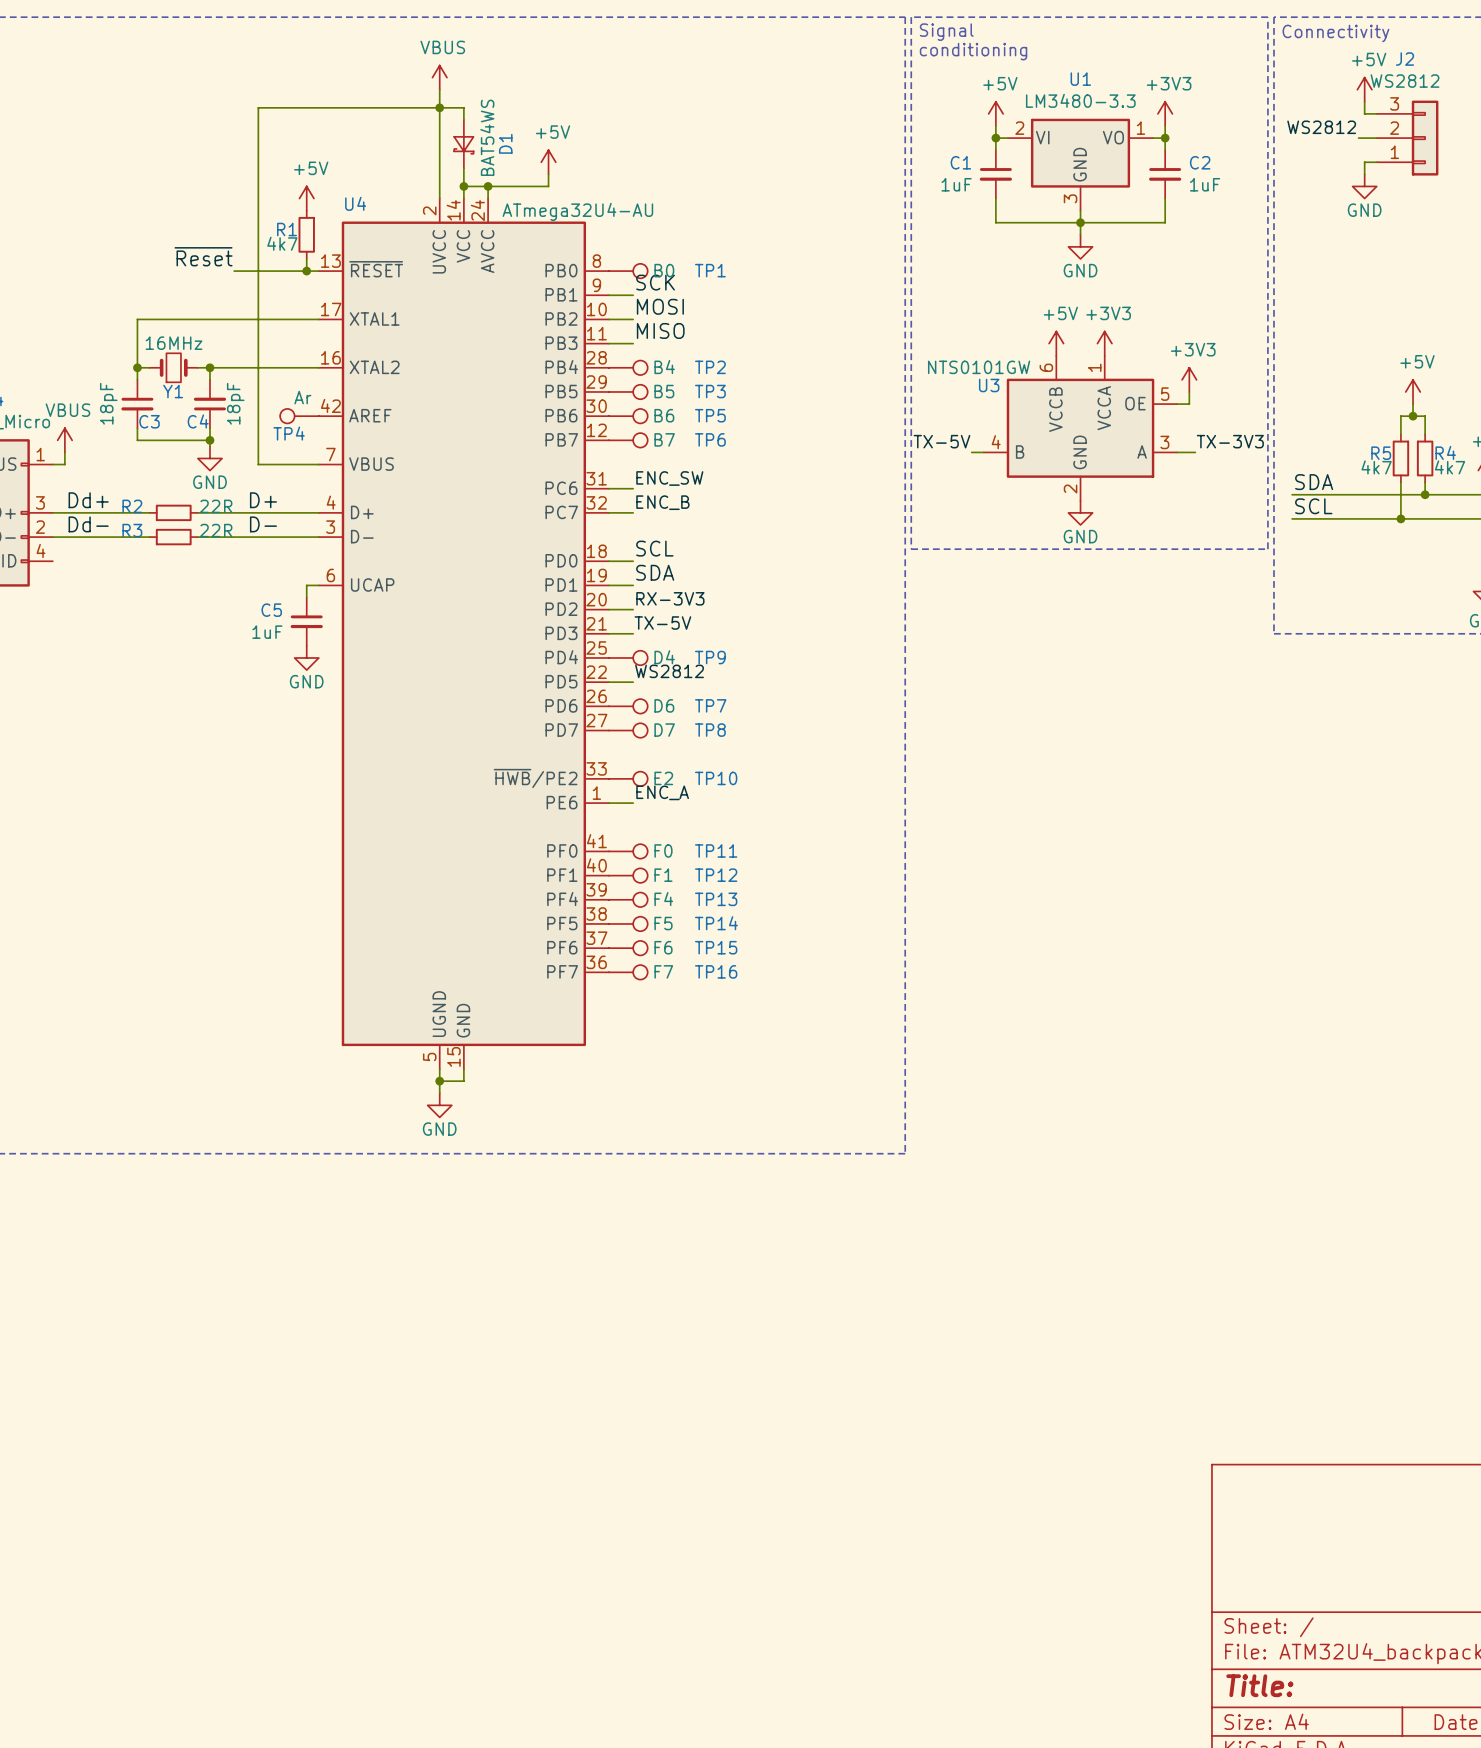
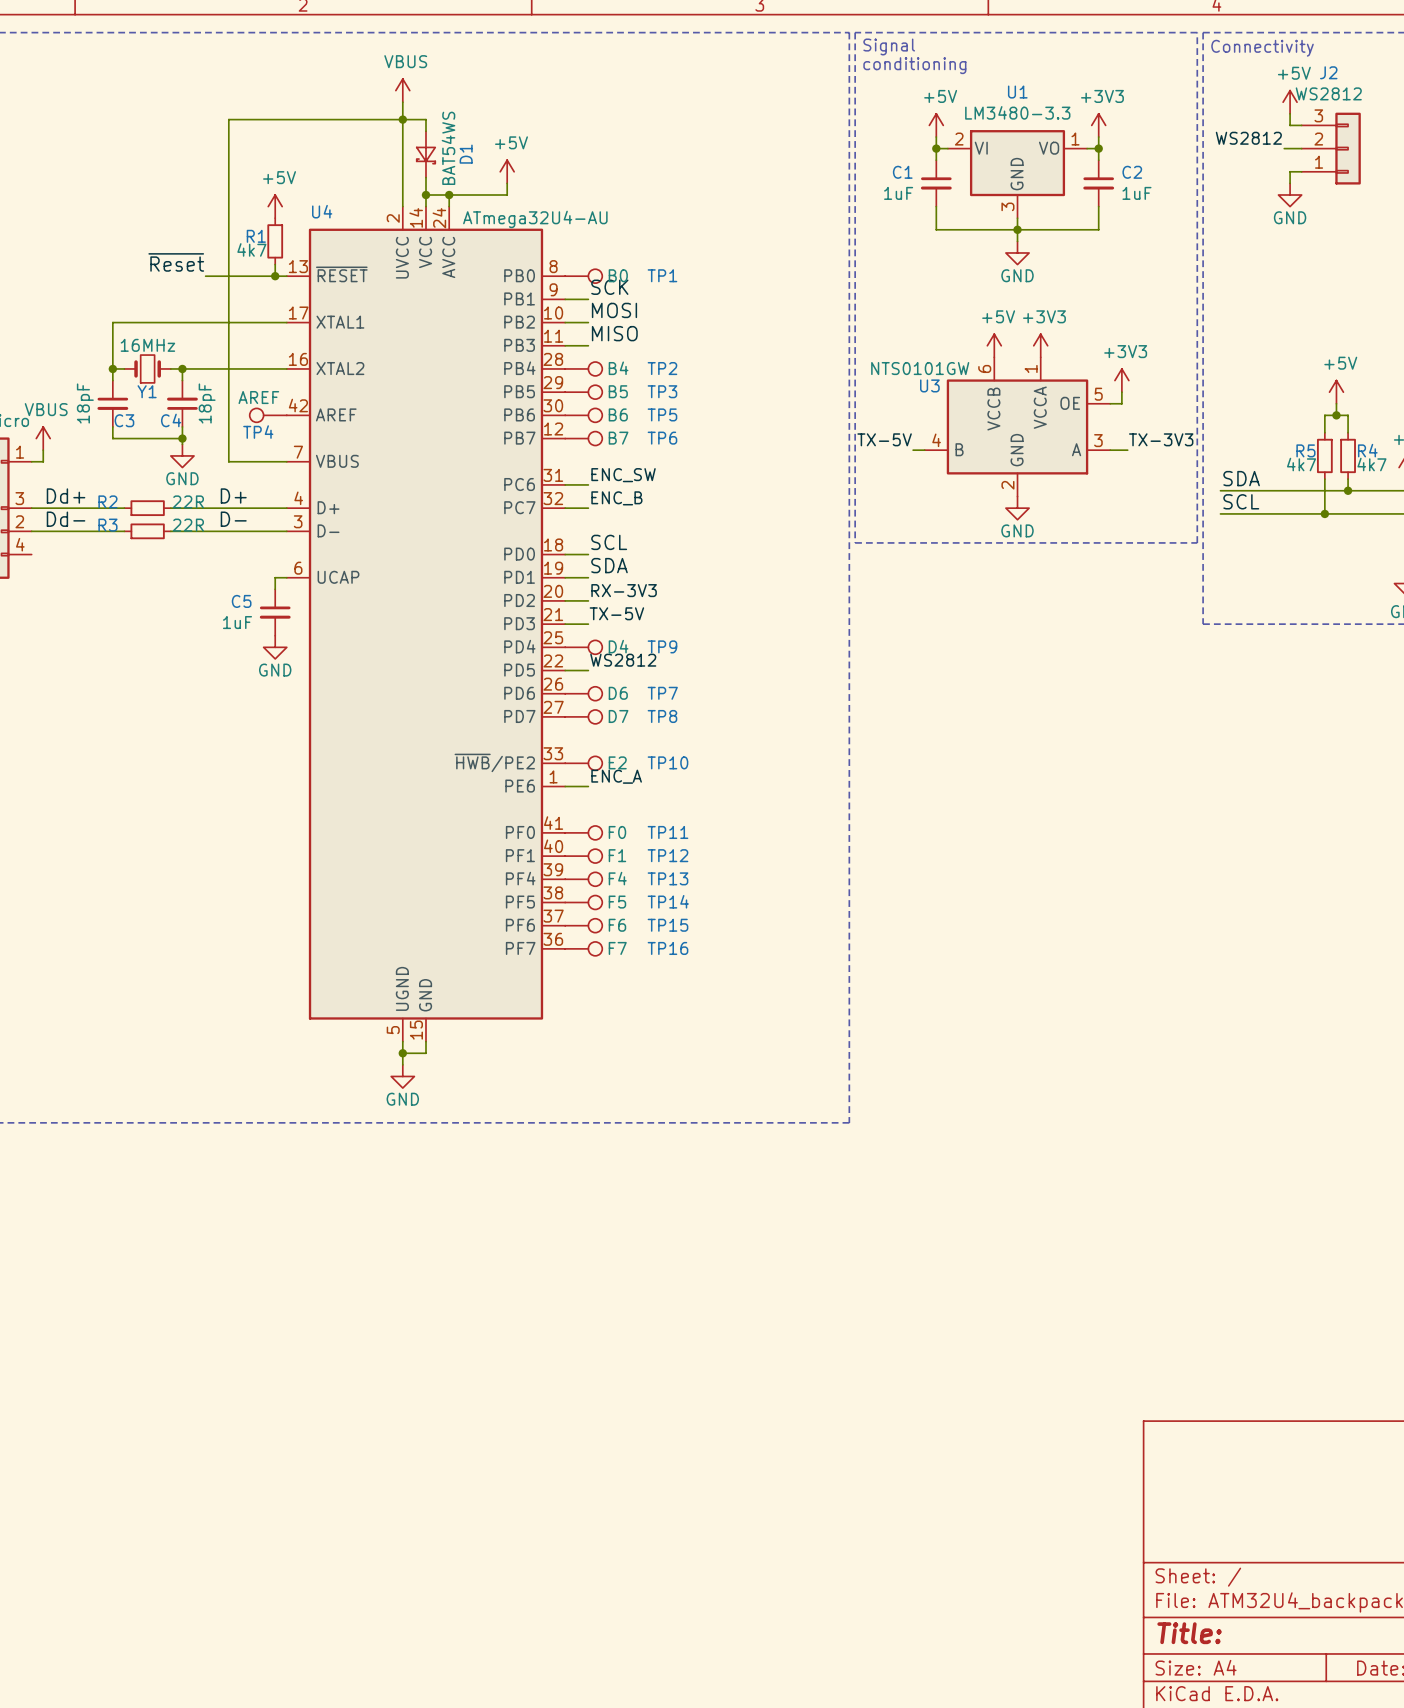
TP4 value: Ar (302, 397) -> AREF (258, 397)

